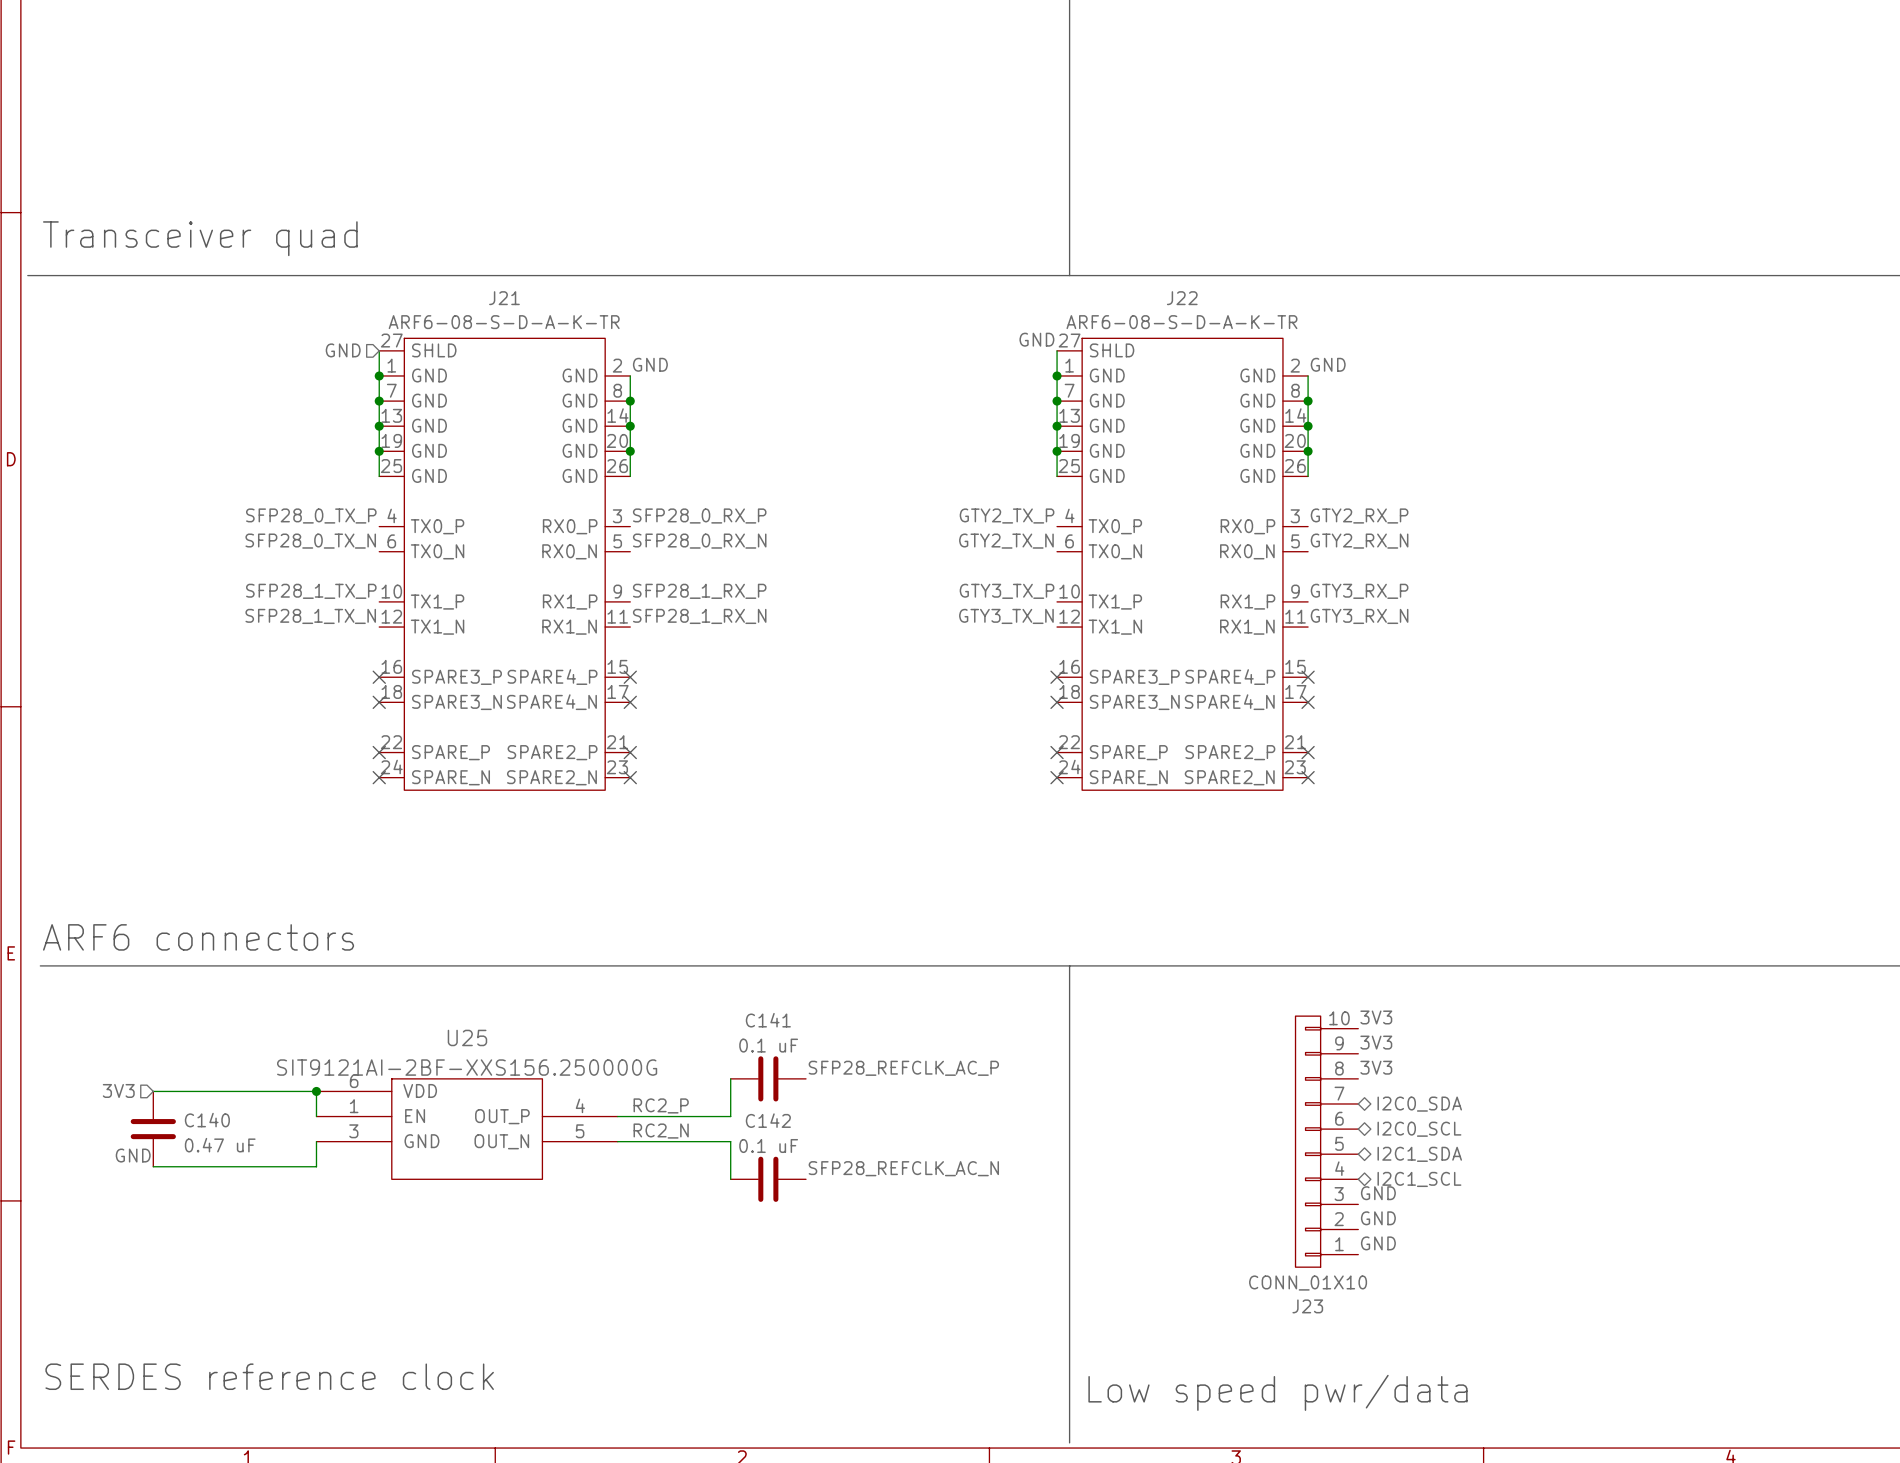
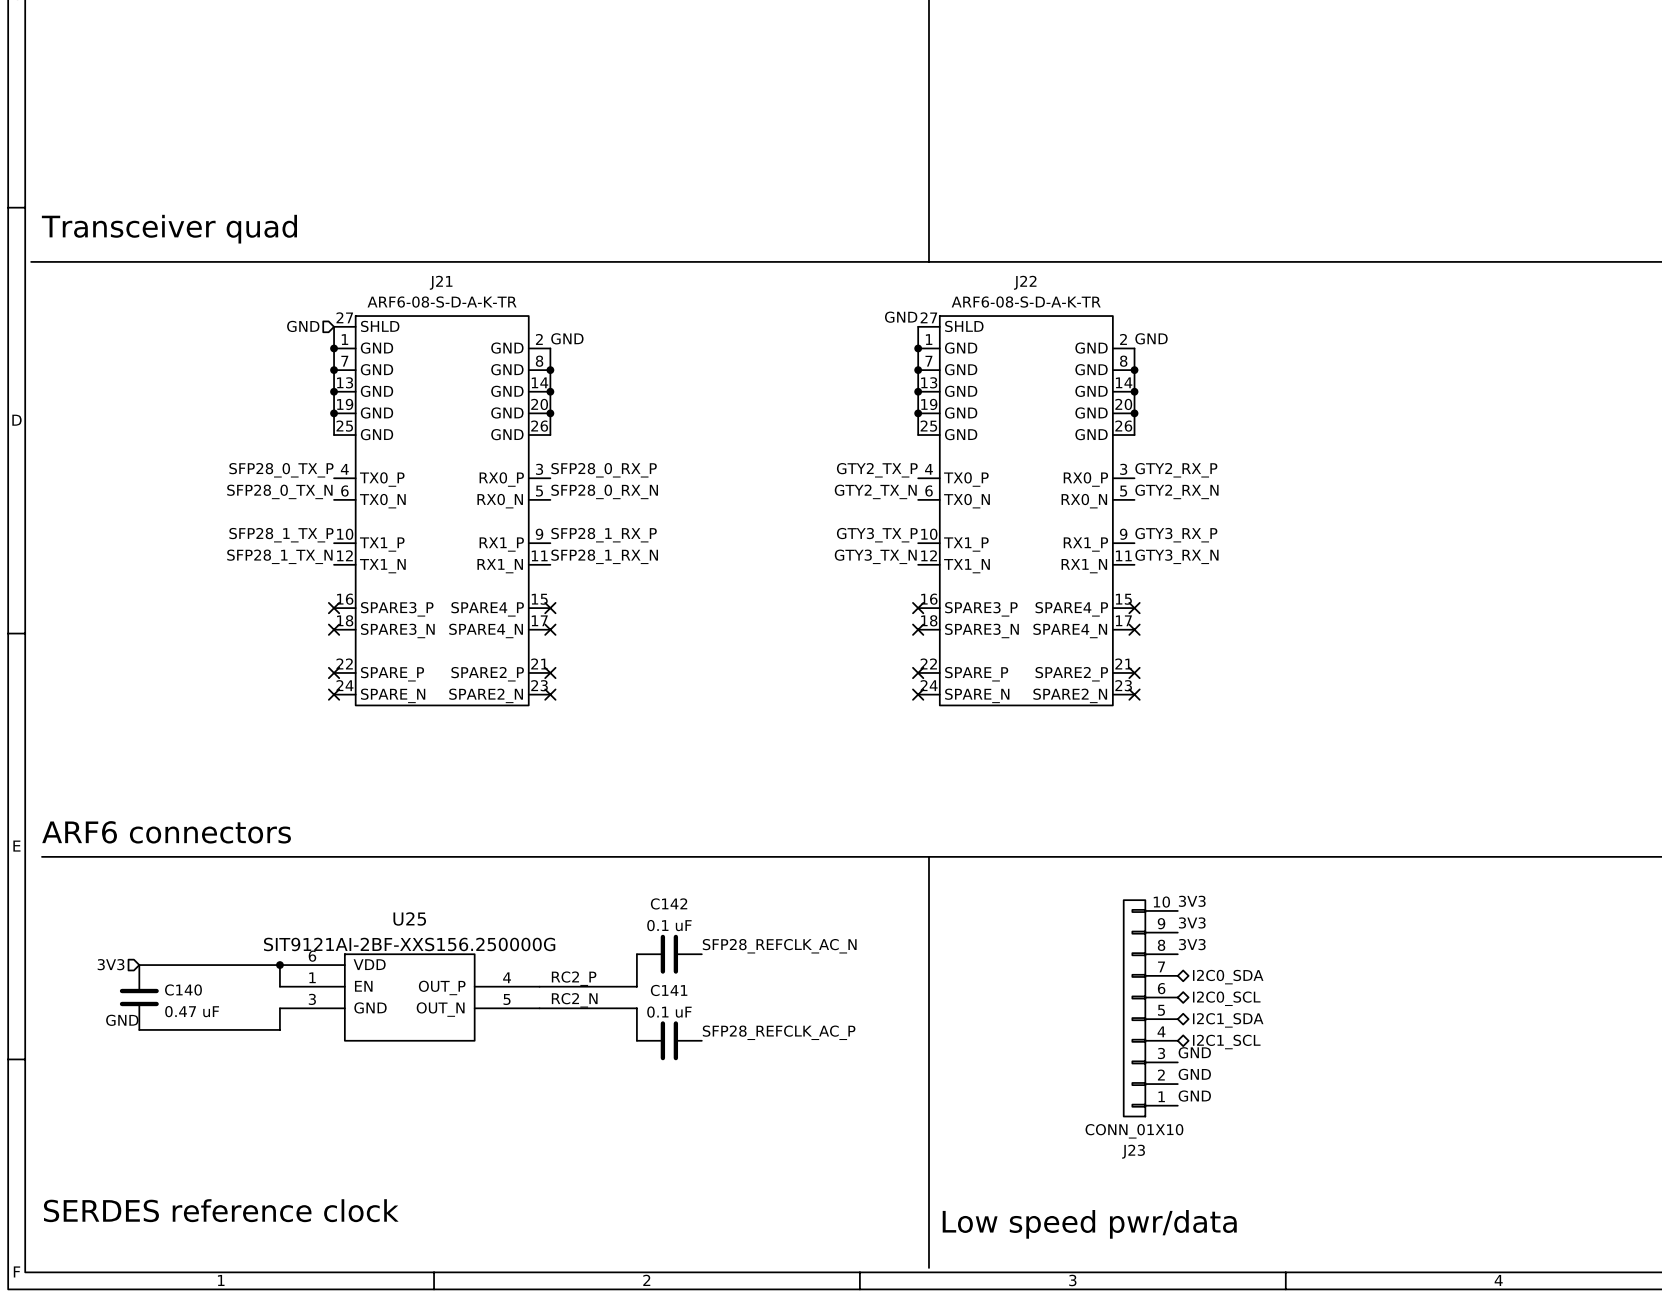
C141 name: C141 (768, 1020) -> C142 (669, 903)
label: SFP28_REFCLK_AC_P (903, 1068) -> SFP28_REFCLK_AC_N (779, 946)
C142 name: C142 (768, 1120) -> C141 (669, 990)
label: SFP28_REFCLK_AC_N (903, 1168) -> SFP28_REFCLK_AC_P (779, 1032)

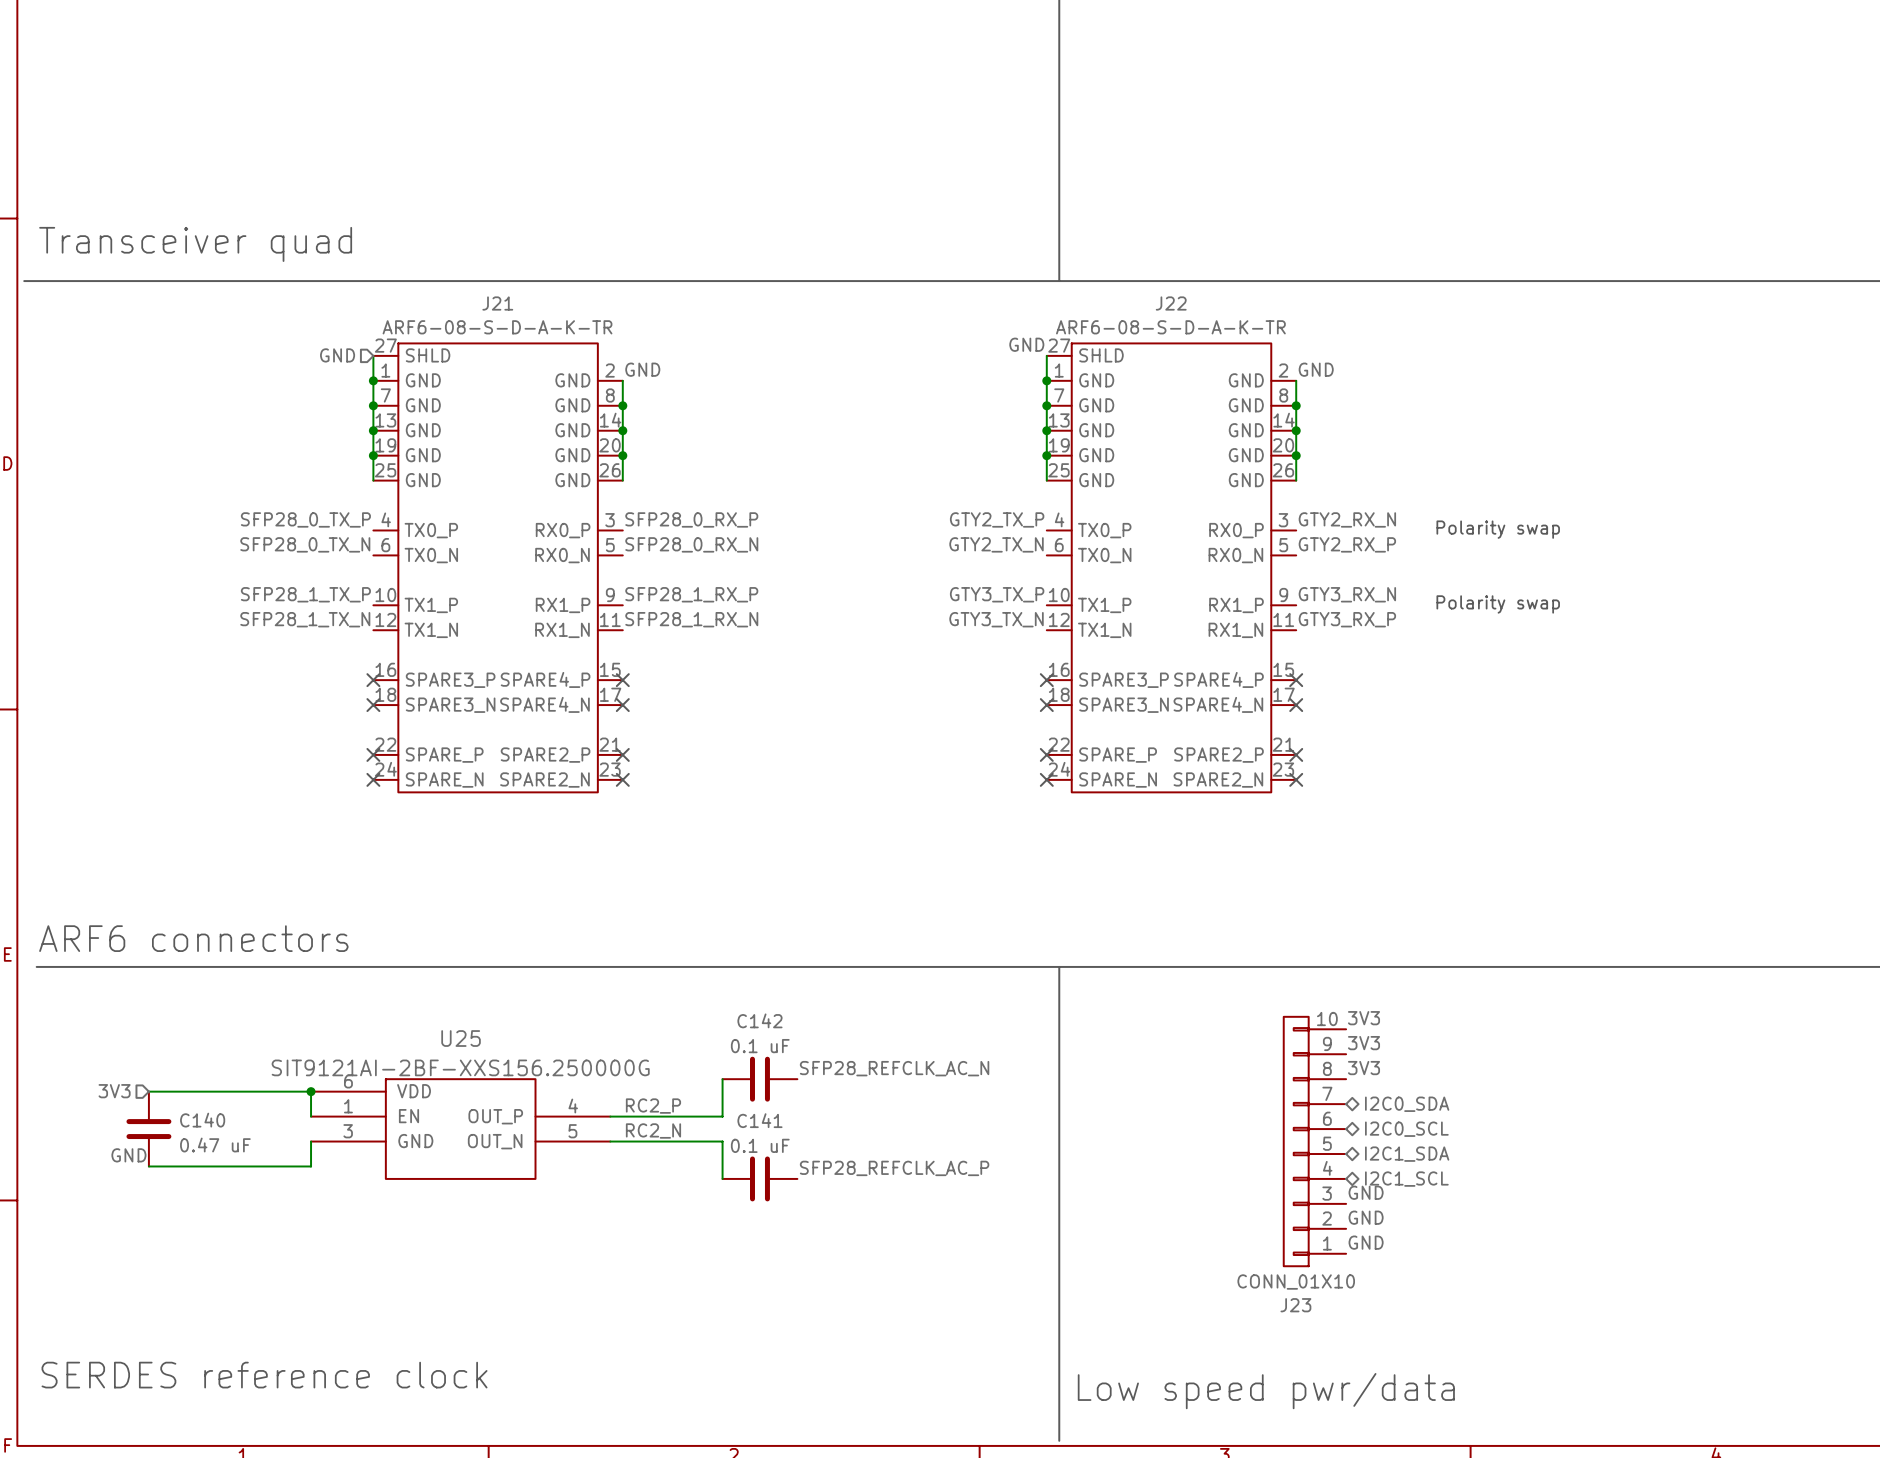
label: GTY2_RX_P (1176, 470) -> GTY2_RX_N (1347, 519)
text: none -> Polarity swap (1498, 529)
label: GTY2_RX_N (1176, 491) -> GTY2_RX_P (1347, 544)
label: GTY3_RX_P (1176, 535) -> GTY3_RX_N (1347, 594)
text: none -> Polarity swap (1498, 604)
label: GTY3_RX_N (1176, 556) -> GTY3_RX_P (1347, 619)

